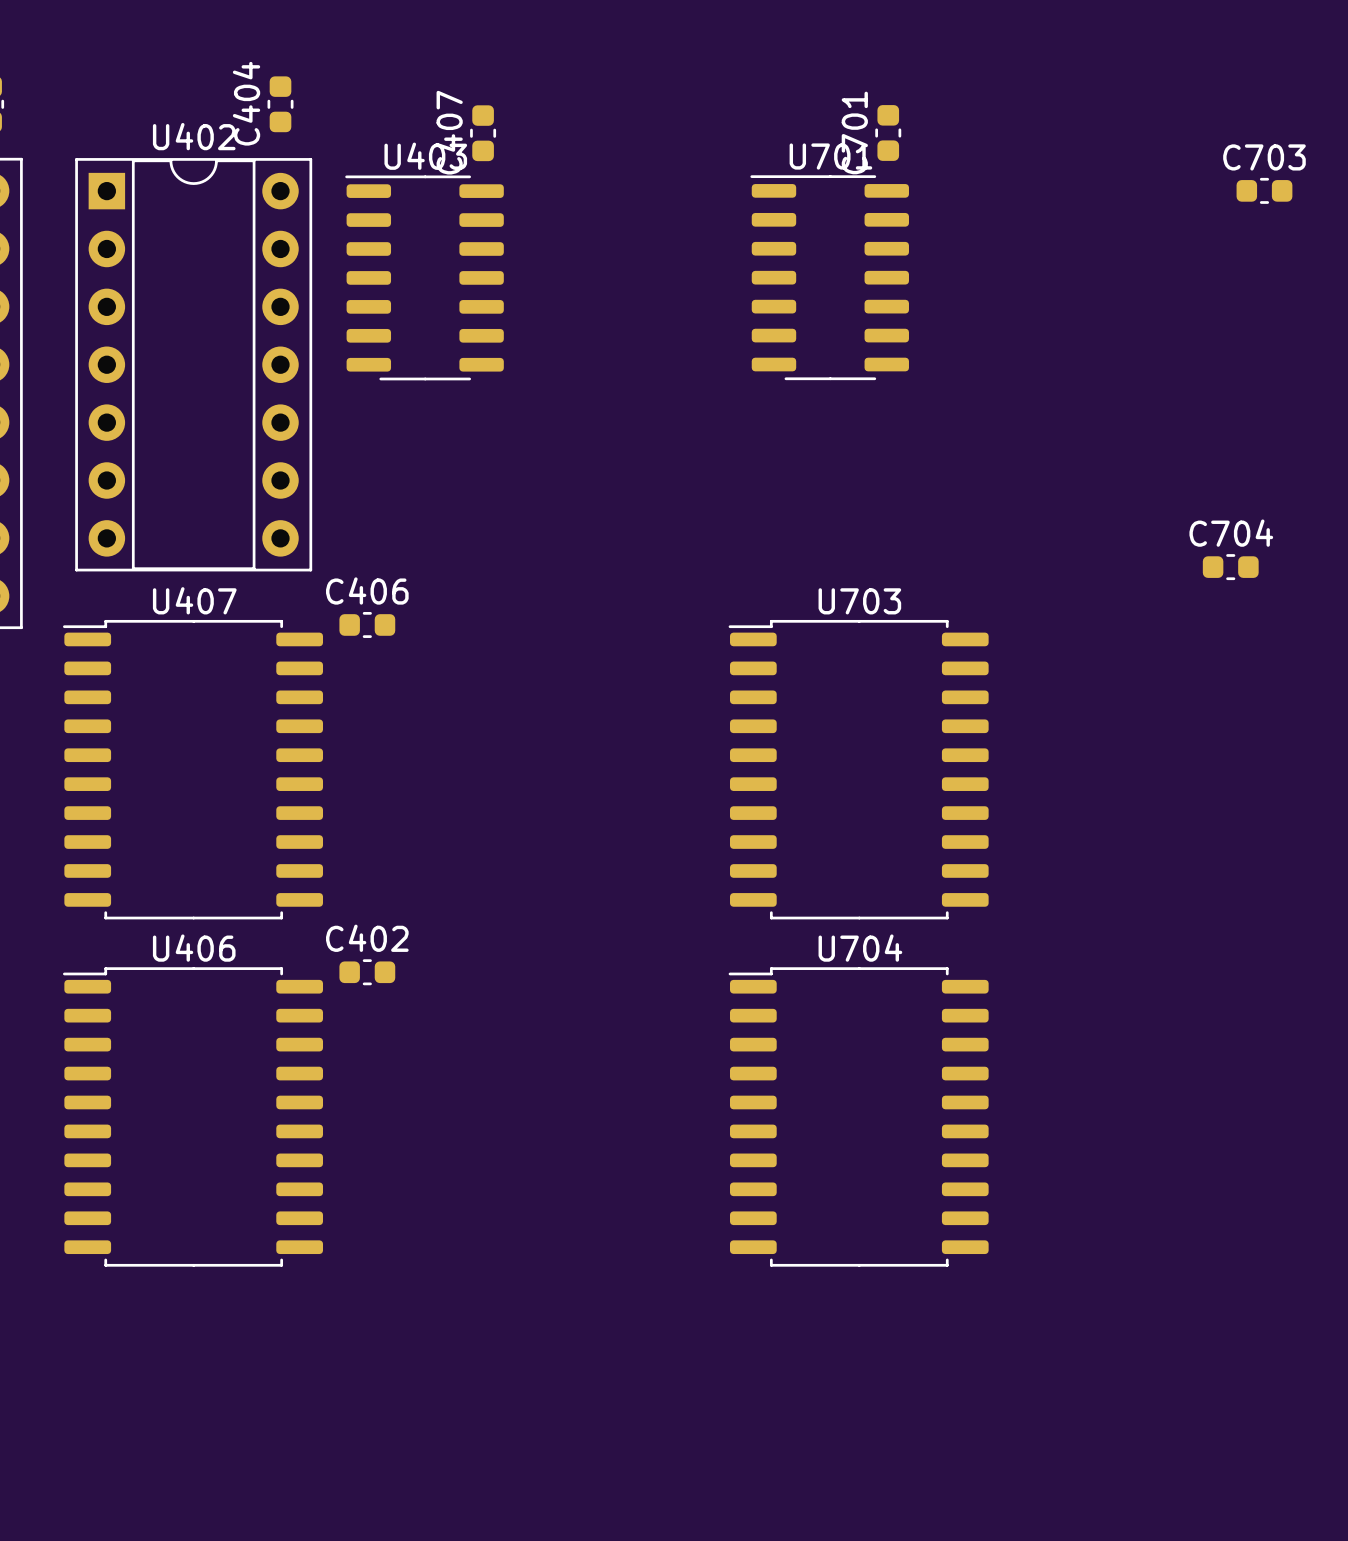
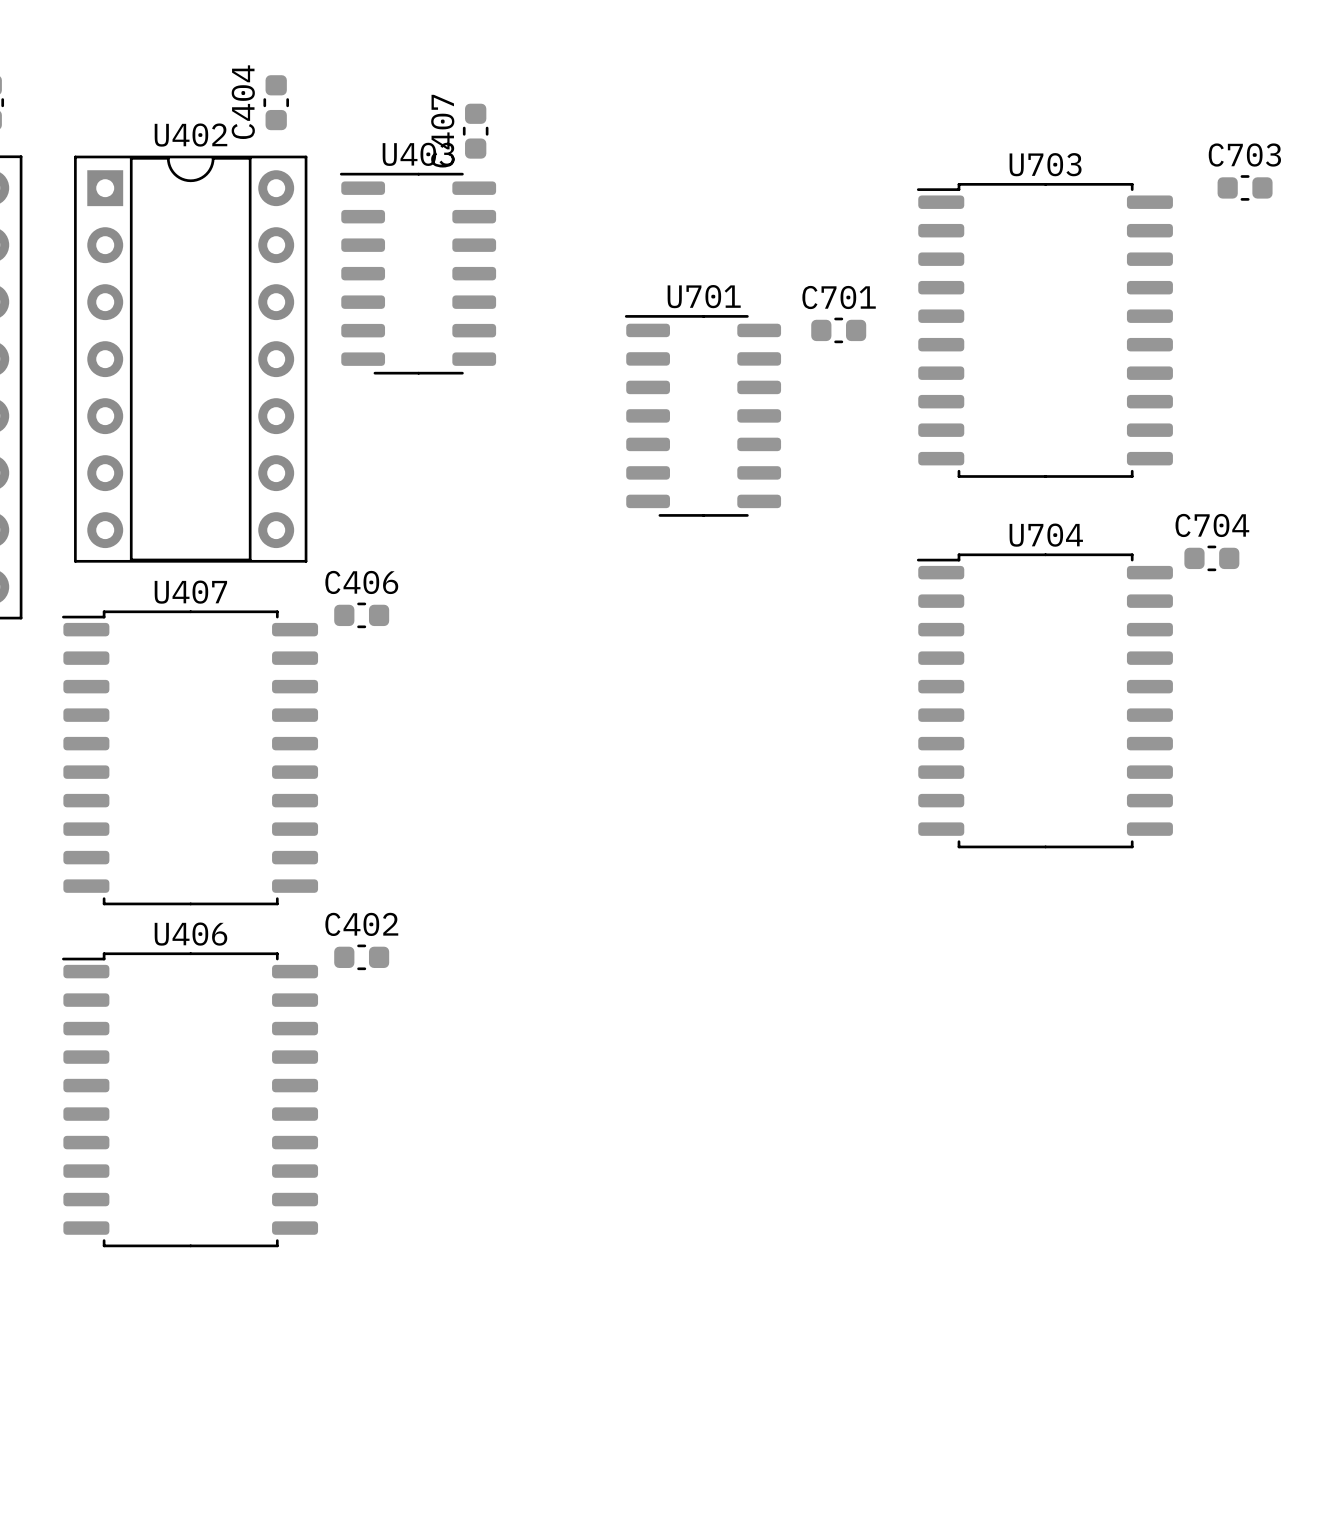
C701 rotation: 0° (888, 132) -> 90° clockwise (838, 330)
C701 position: (888, 132) -> (838, 330)
U701 position: (829, 277) -> (702, 415)
U703 position: (858, 769) -> (1044, 330)
U704 position: (858, 1116) -> (1044, 700)

